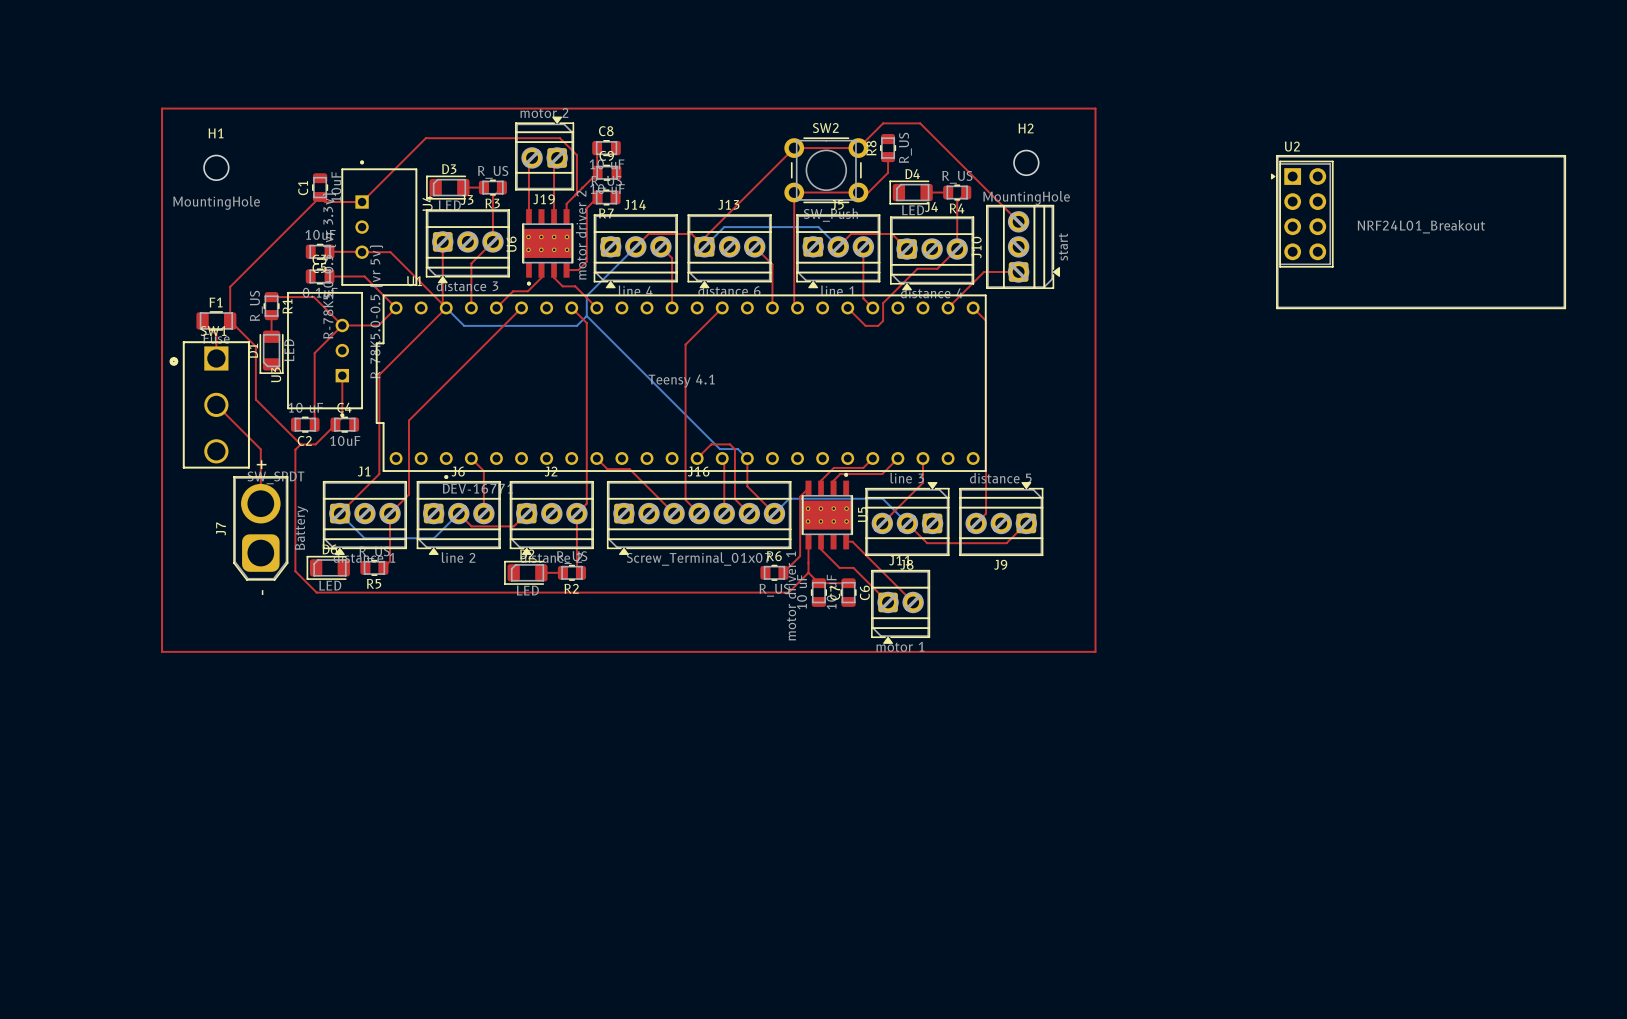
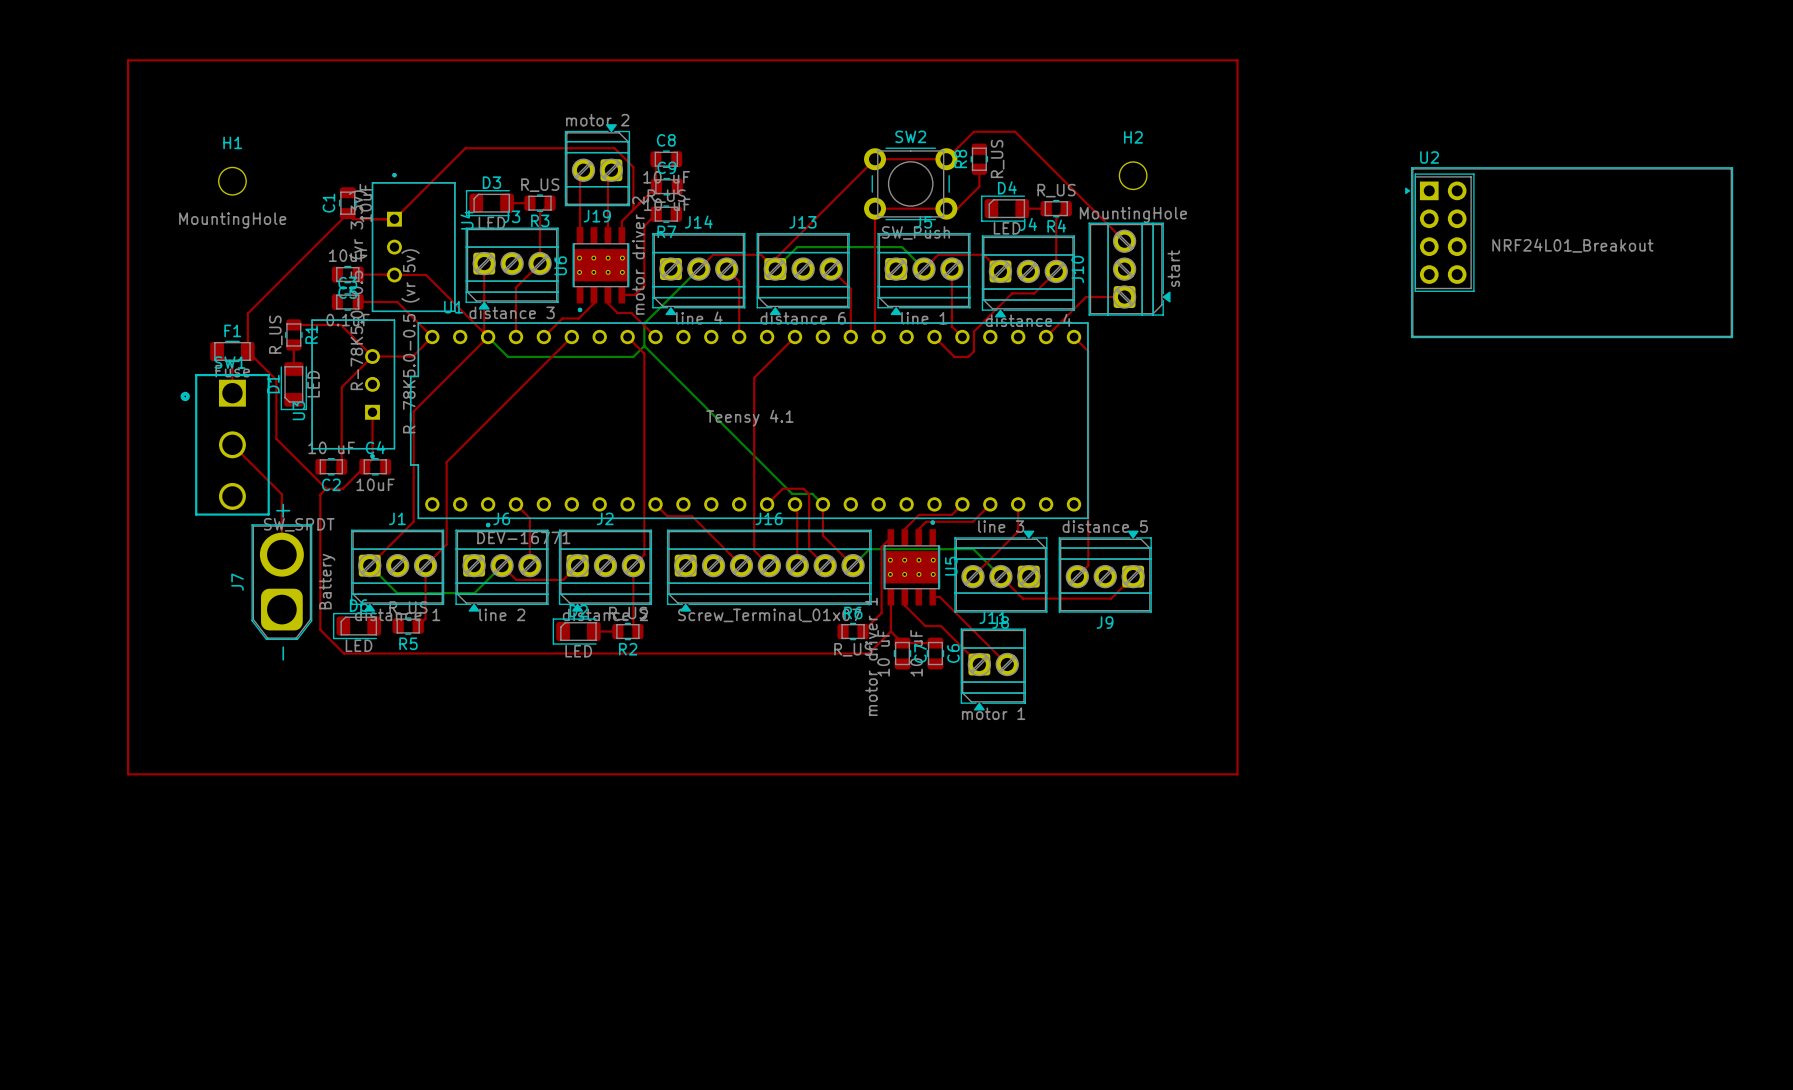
top track: (162, 108) (1095, 108) (1095, 651) (162, 651) (162, 108) -> (128, 60) (128, 774) (1237, 774) (1237, 60) (128, 60)

